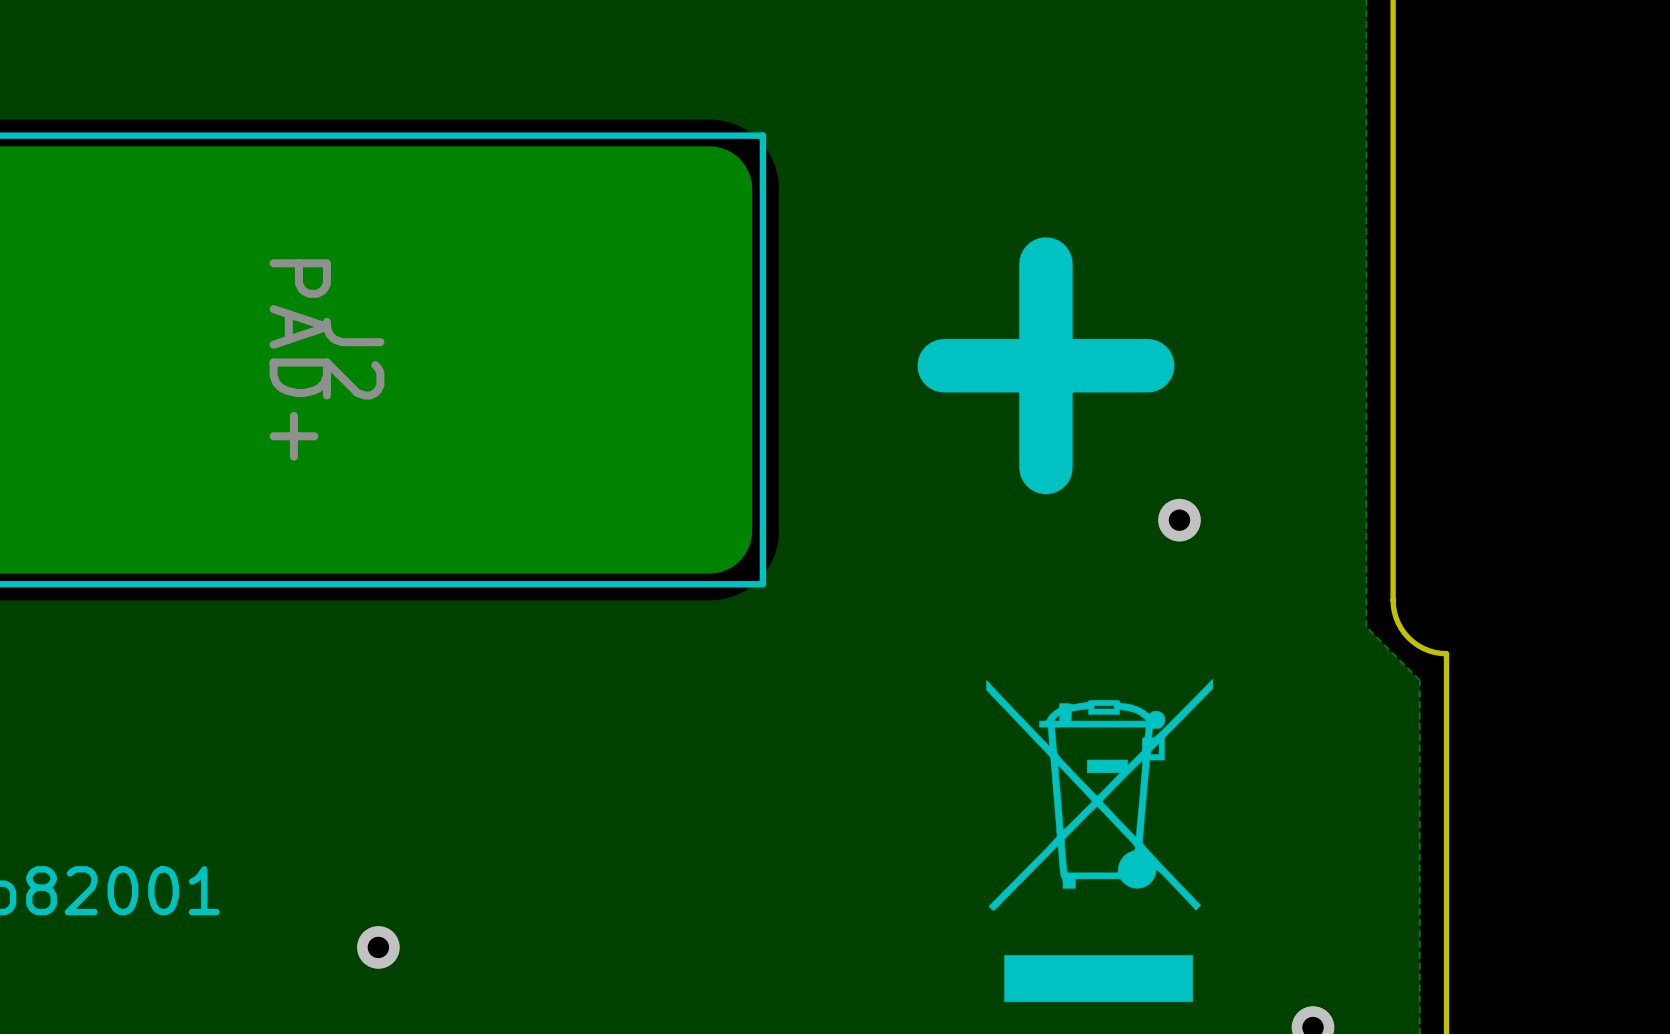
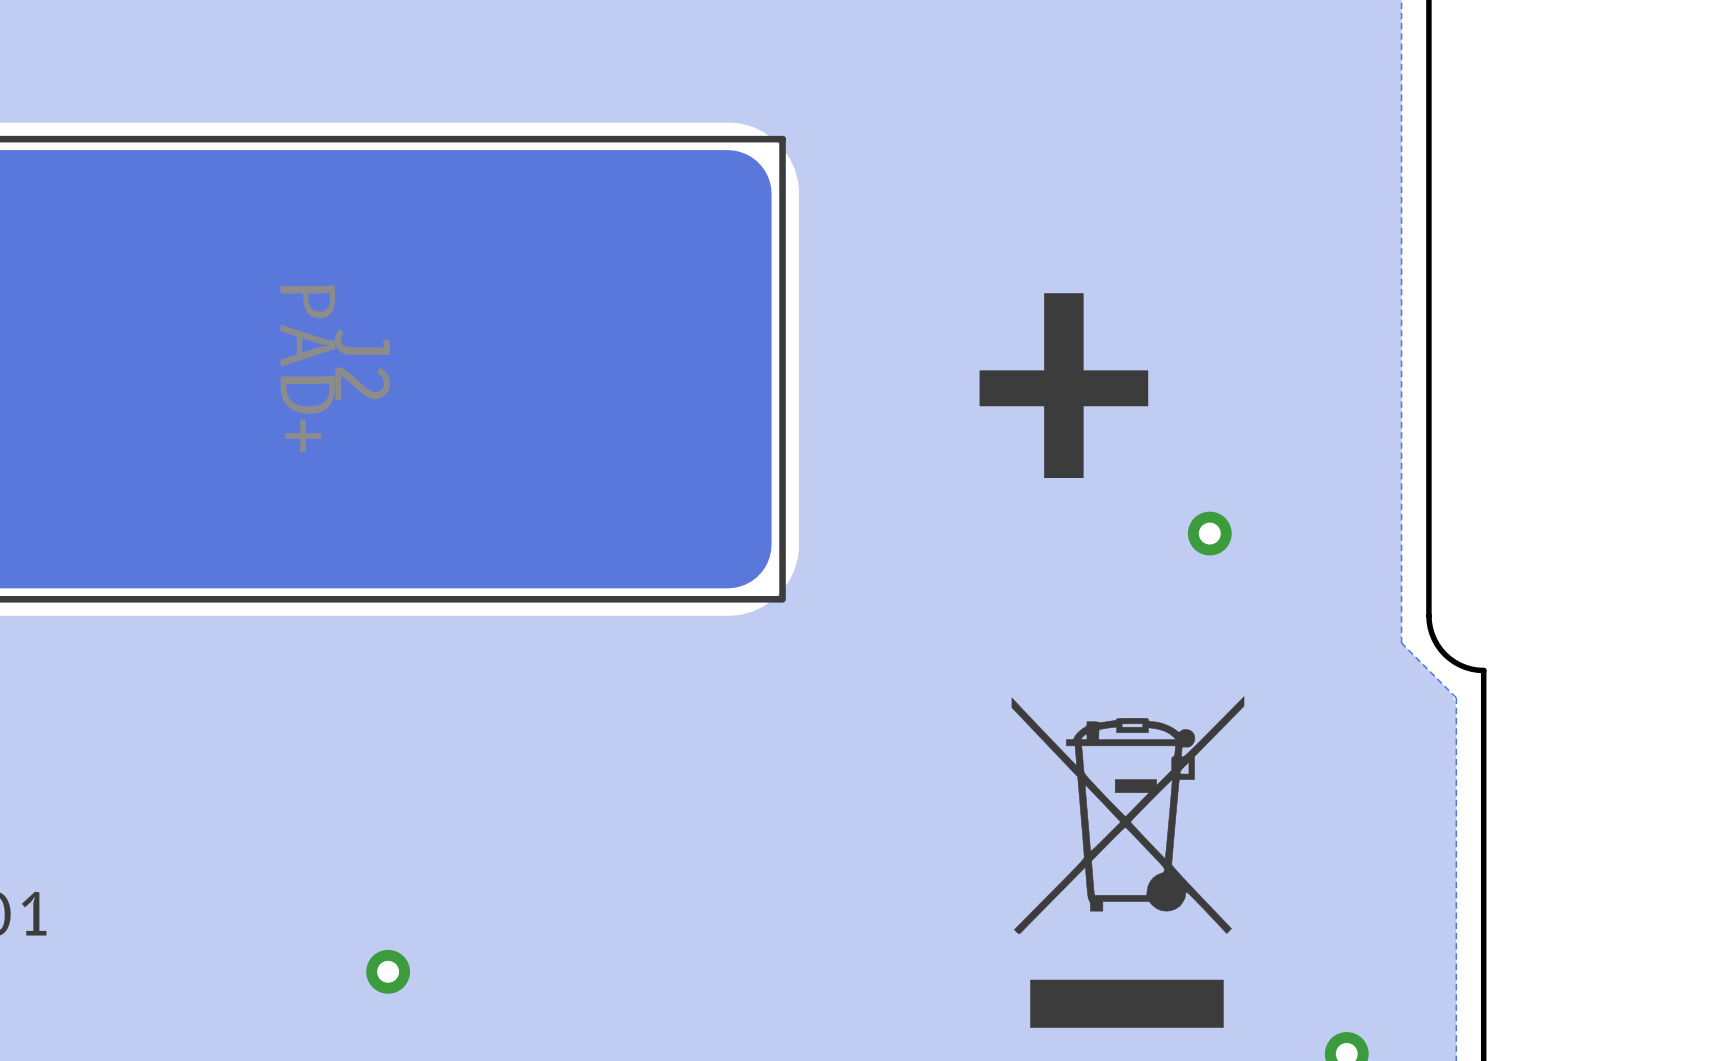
text position: + (1045, 365) -> + (1063, 385)

